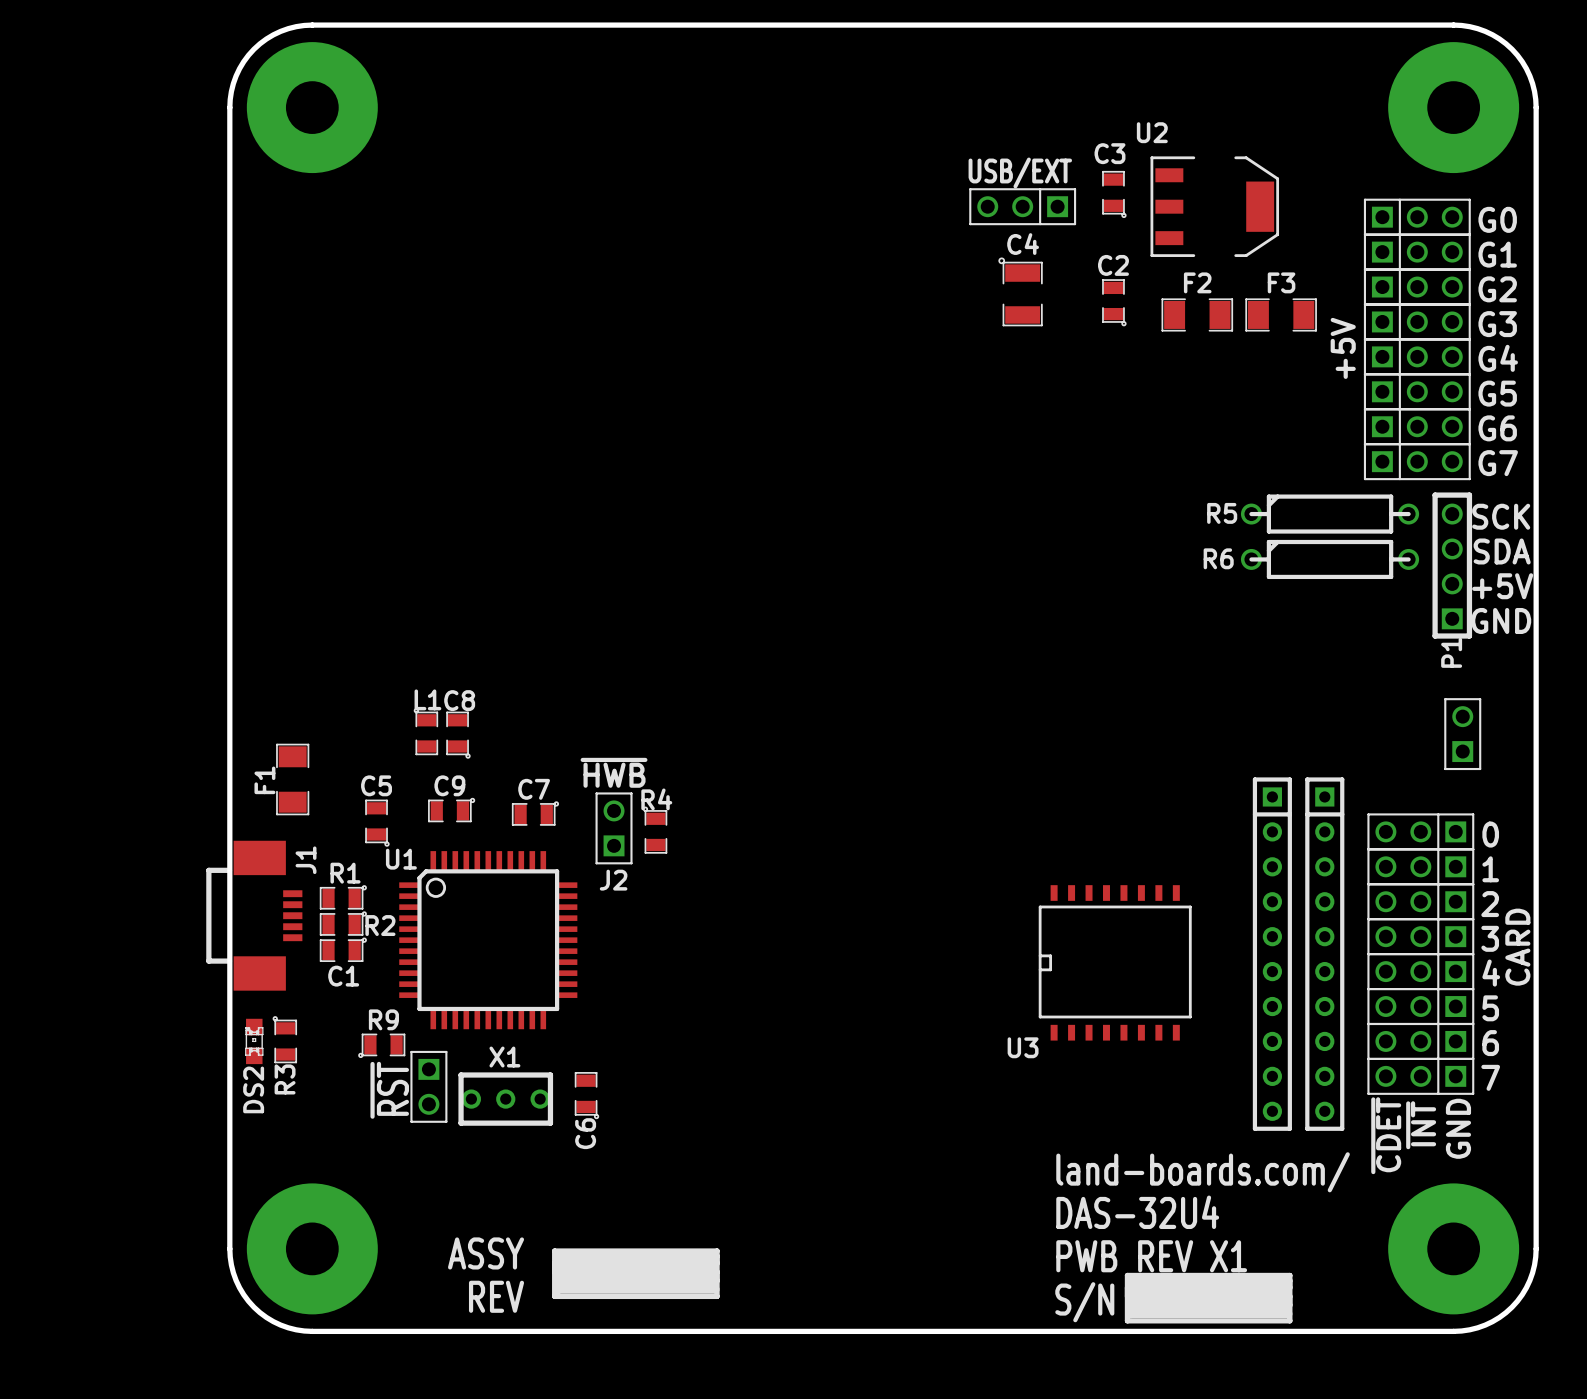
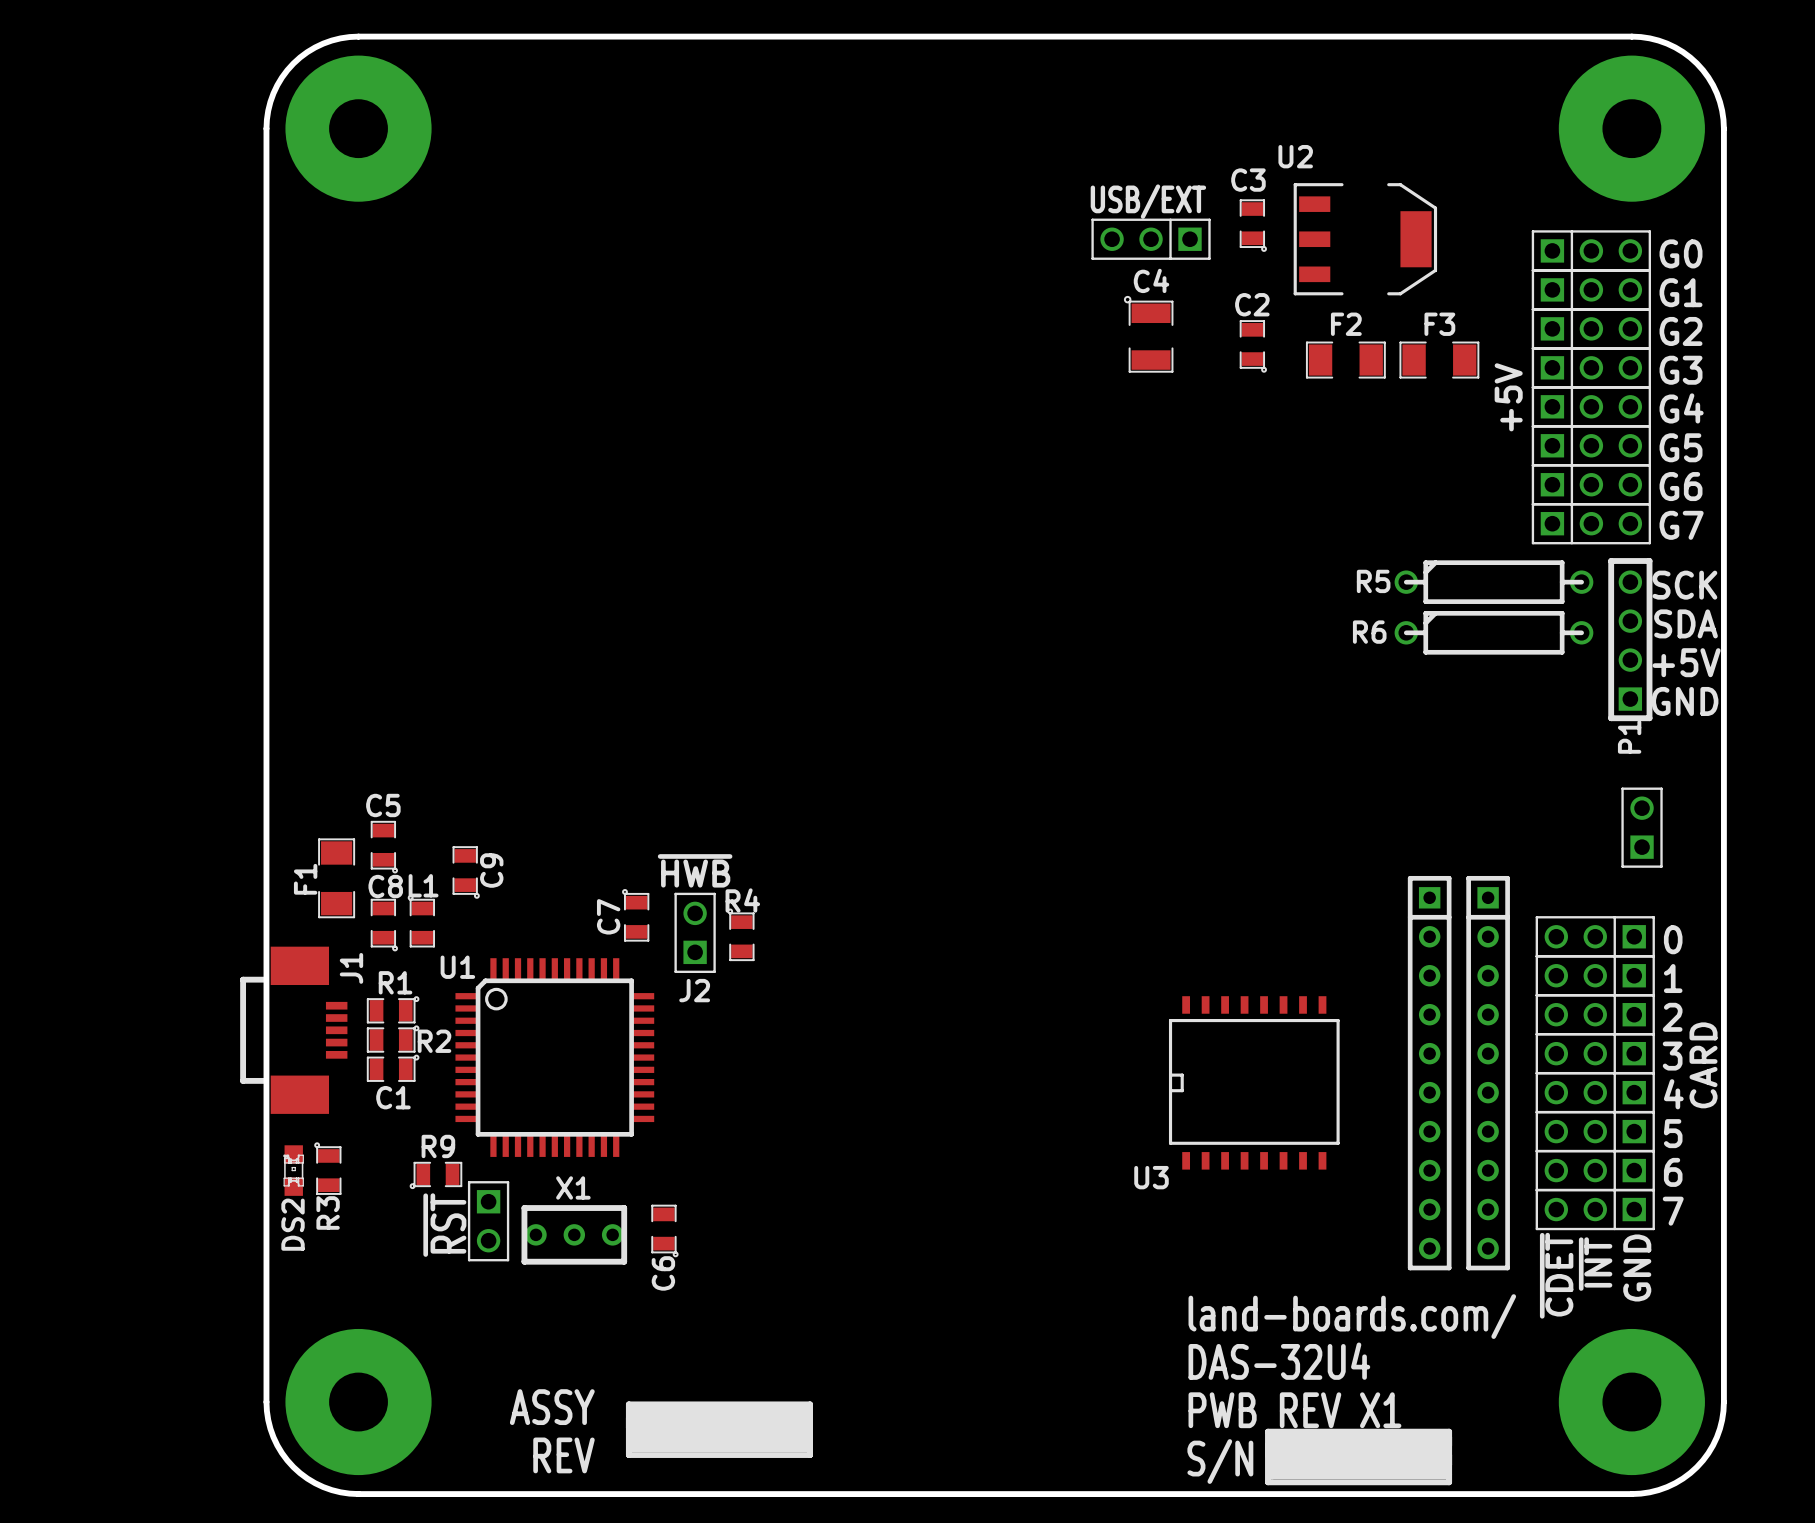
L1 position: (425, 731) -> (421, 921)
C8 position: (458, 735) -> (384, 925)
C9 rotation: 0° (451, 810) -> 90° clockwise (466, 872)
C9 position: (451, 810) -> (466, 872)
C7 rotation: 0° (535, 813) -> 90° counterclockwise (635, 915)
C5 position: (377, 823) -> (384, 847)

